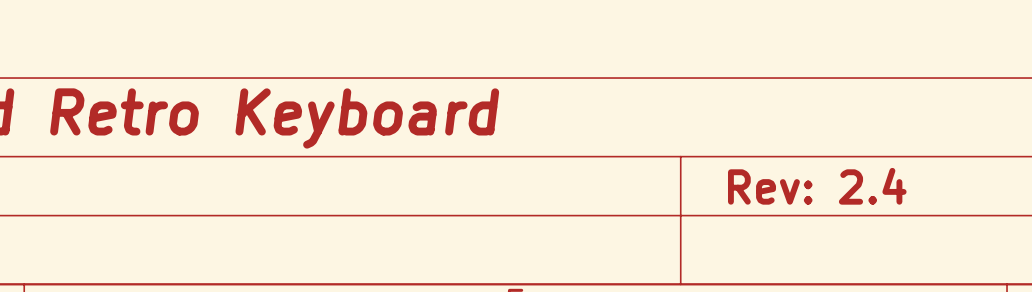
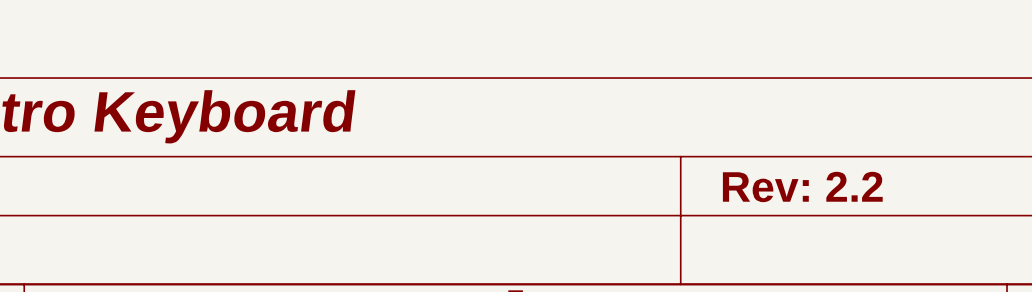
title block: Rev: 2.4 (817, 186) -> Rev: 2.2 (802, 186)

